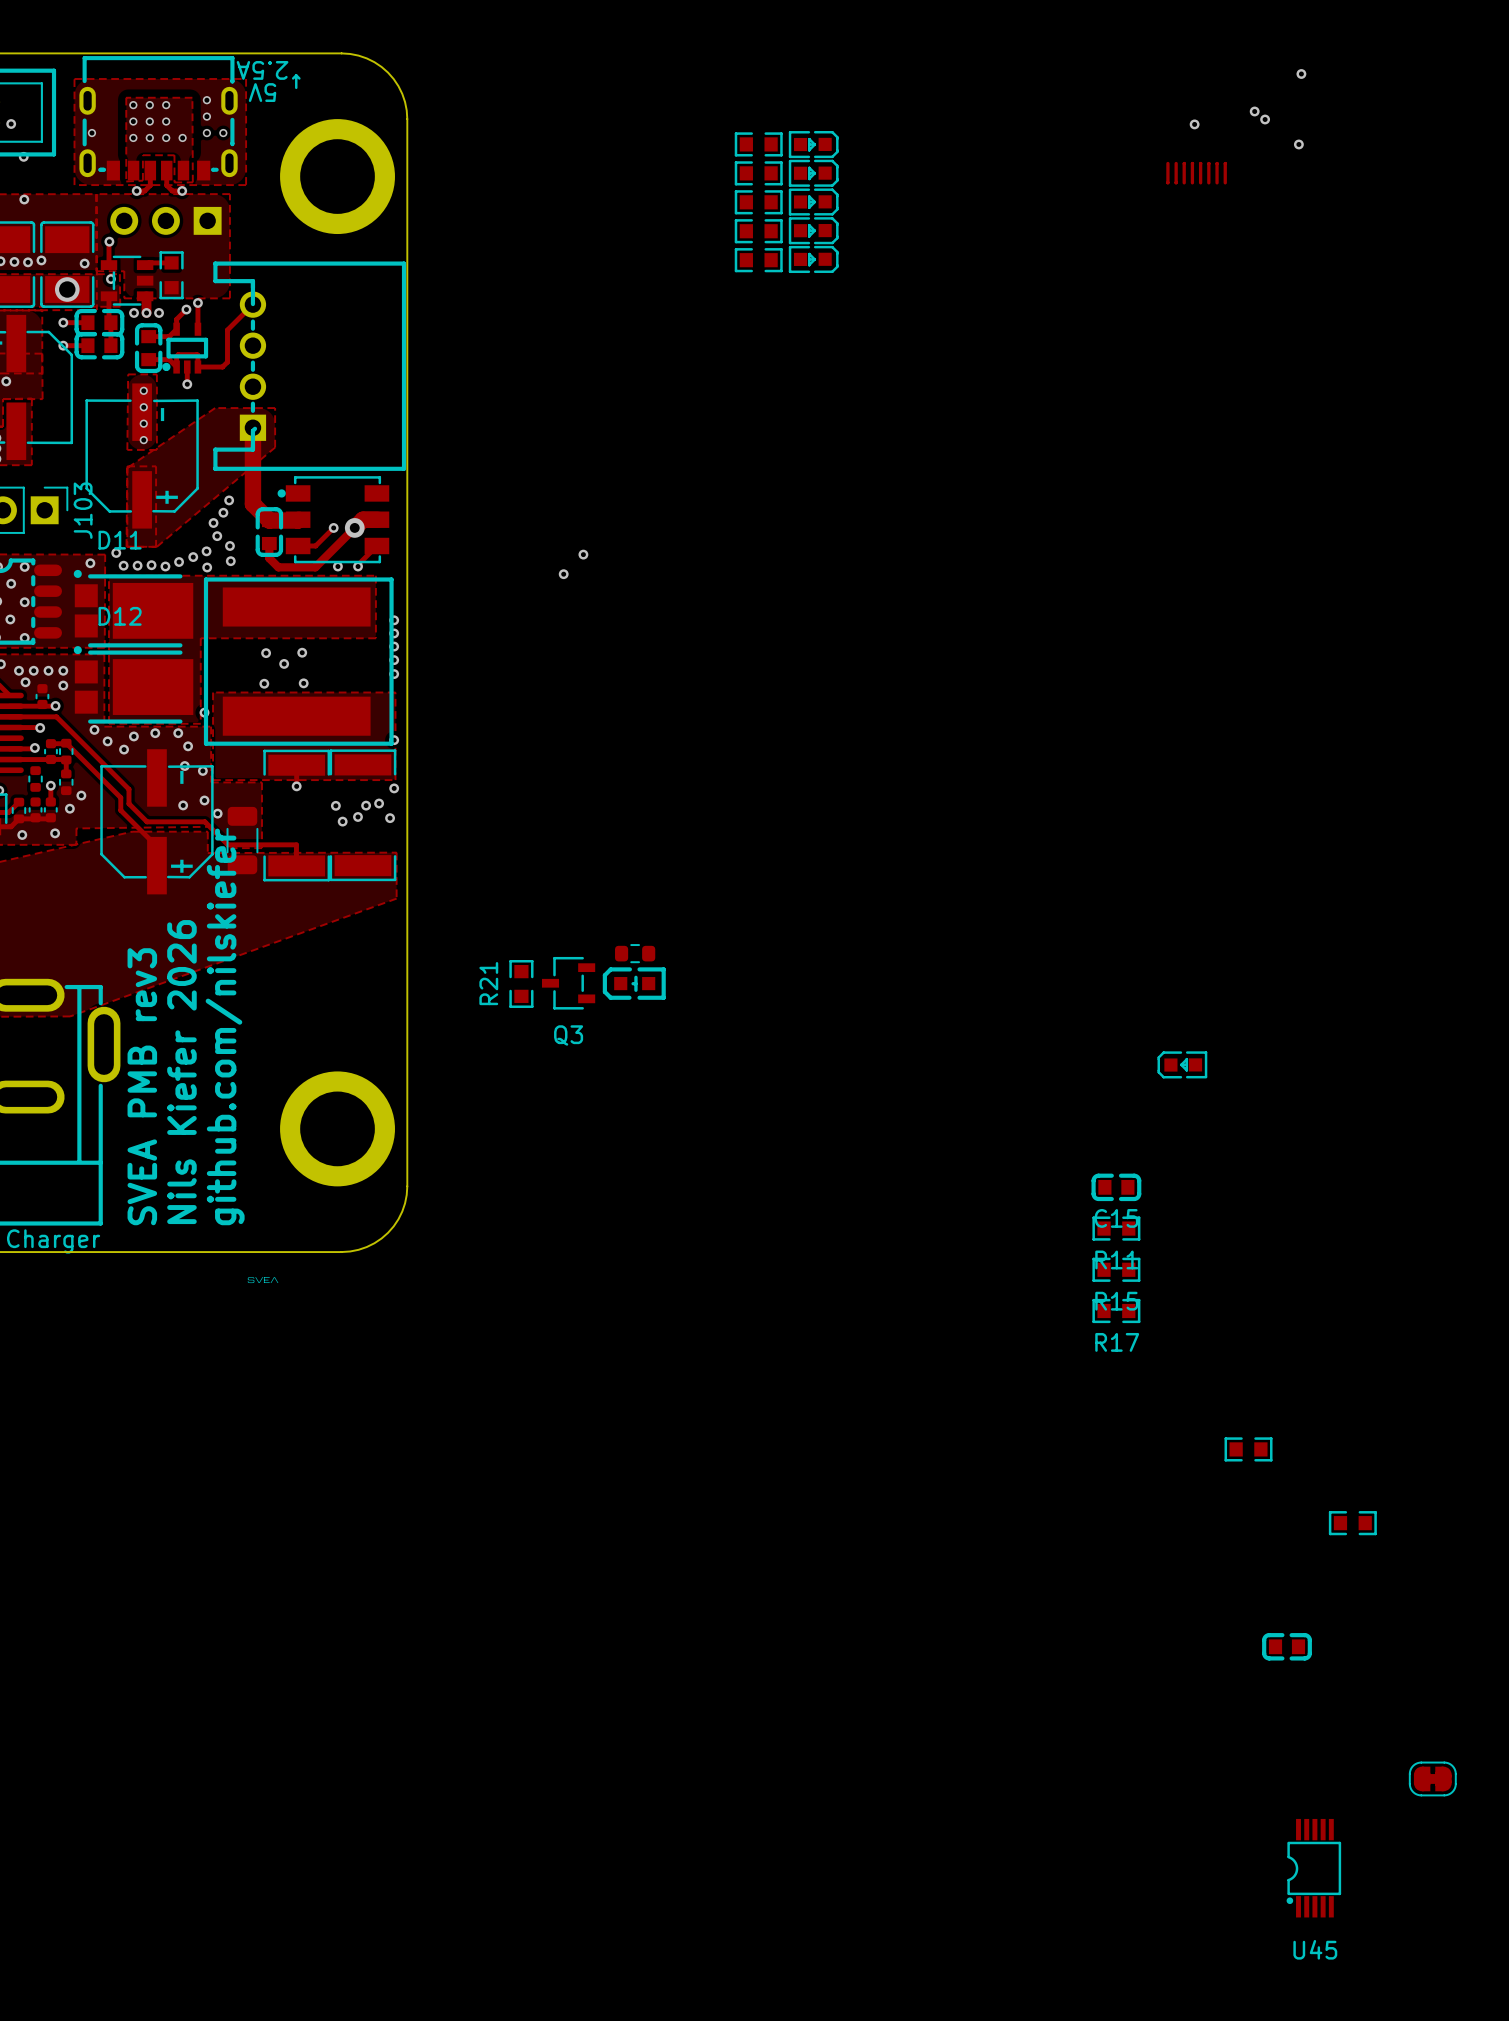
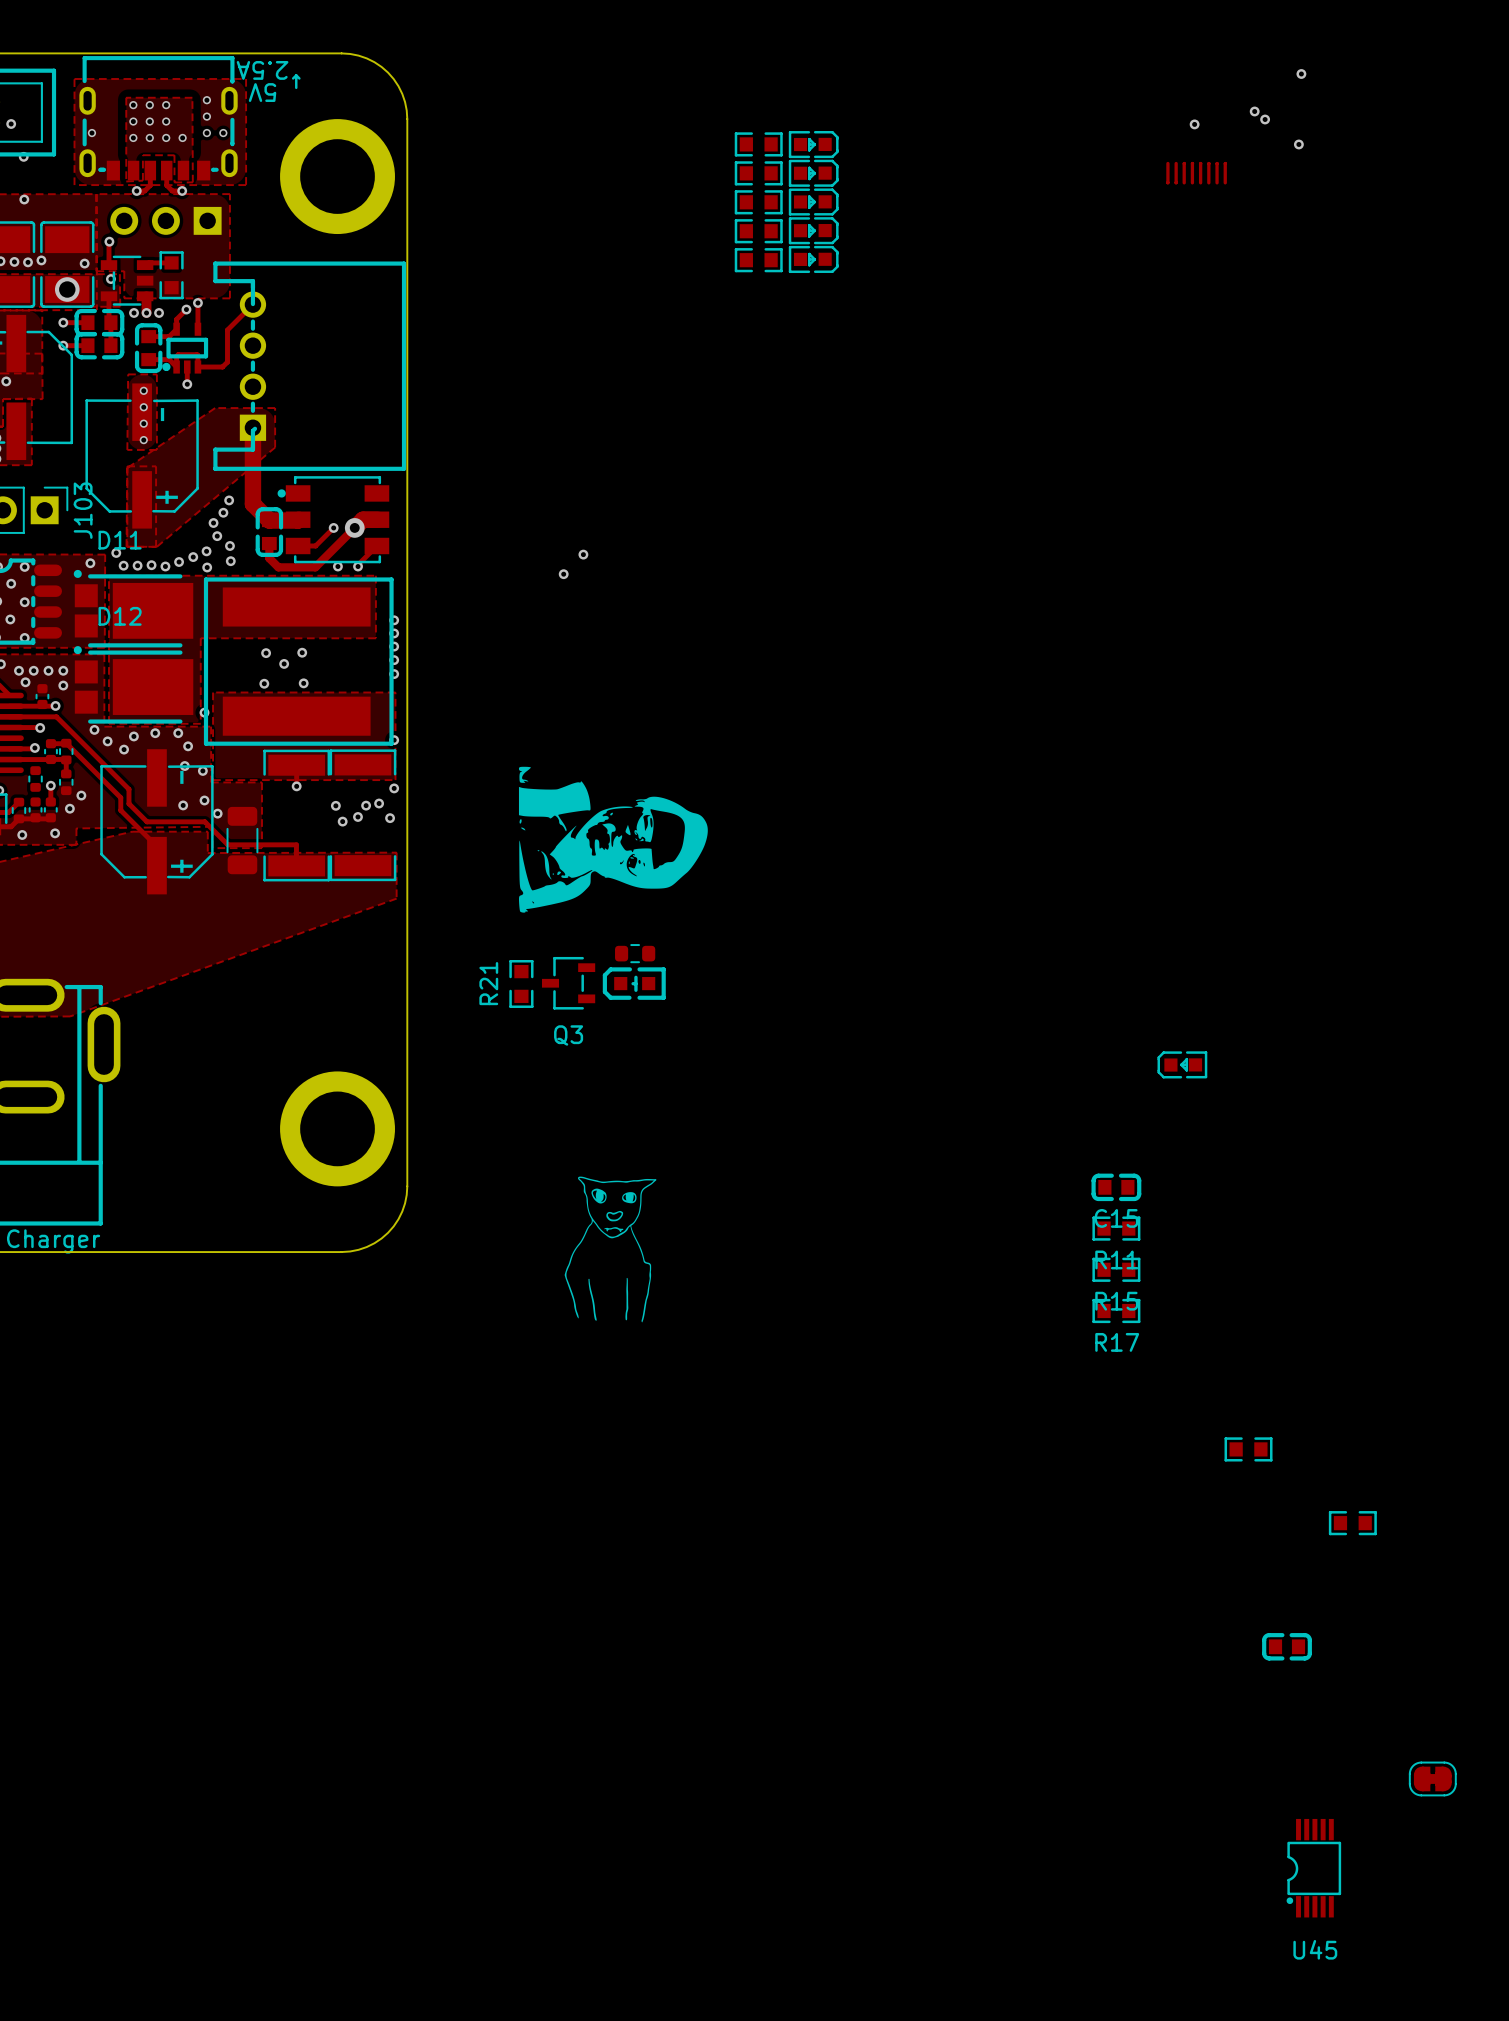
drawing: none -> [518, 766, 708, 913]
text: github.com/nilskiefer (225, 1026) -> none
text: Nils Kiefer 2026 (181, 1072) -> none
text: SVEA PMB rev3 (142, 1086) -> none
drawing: none -> [564, 1176, 657, 1323]
drawing: [247, 1277, 279, 1284] -> none

